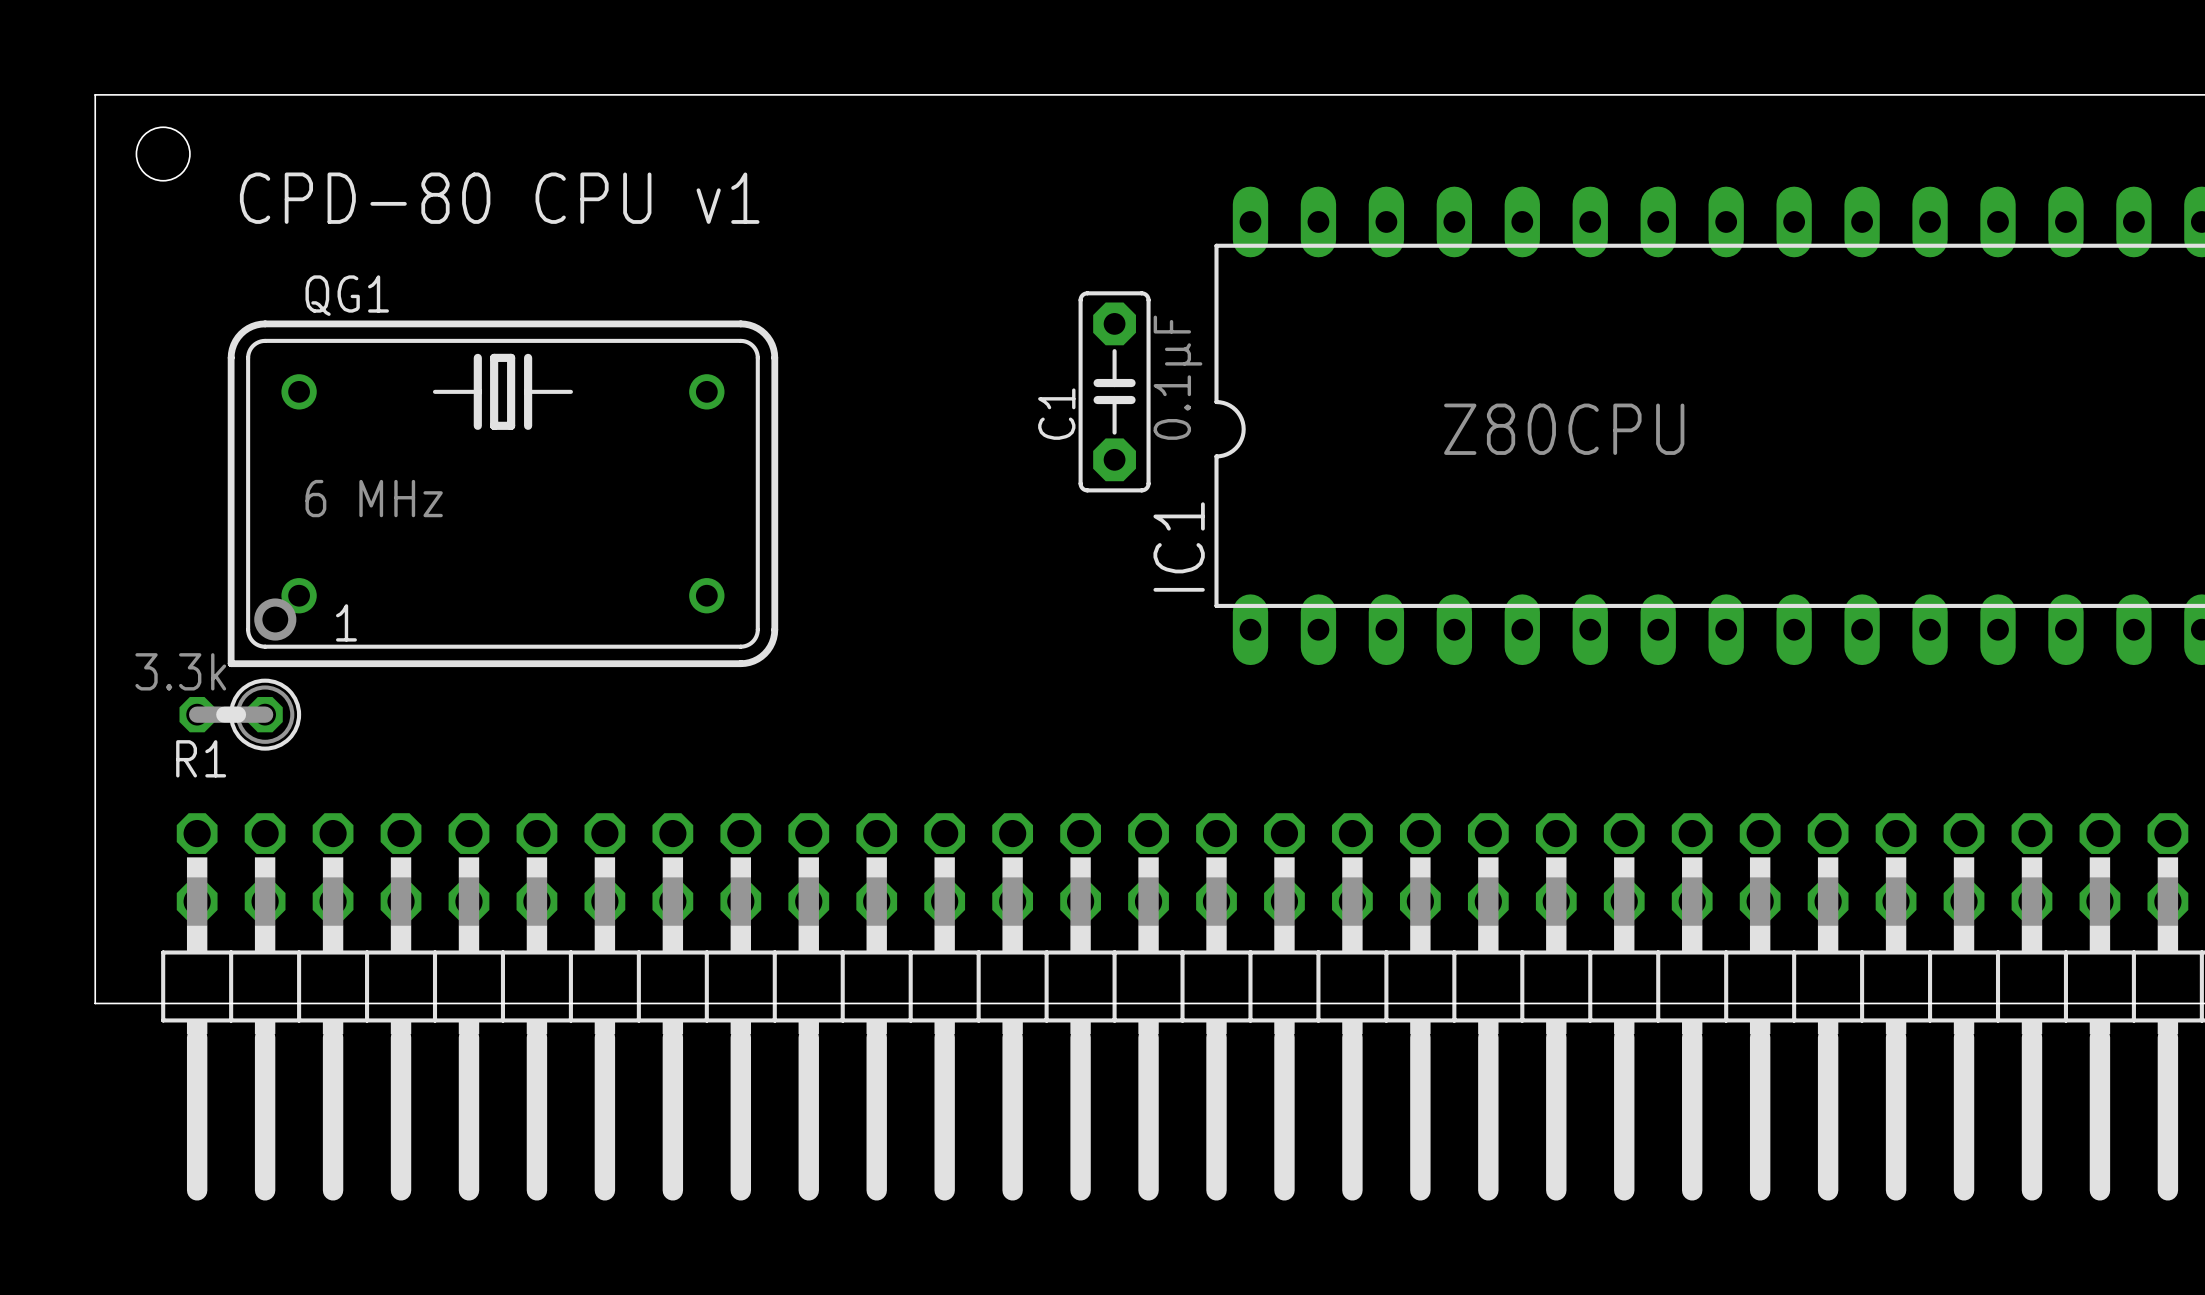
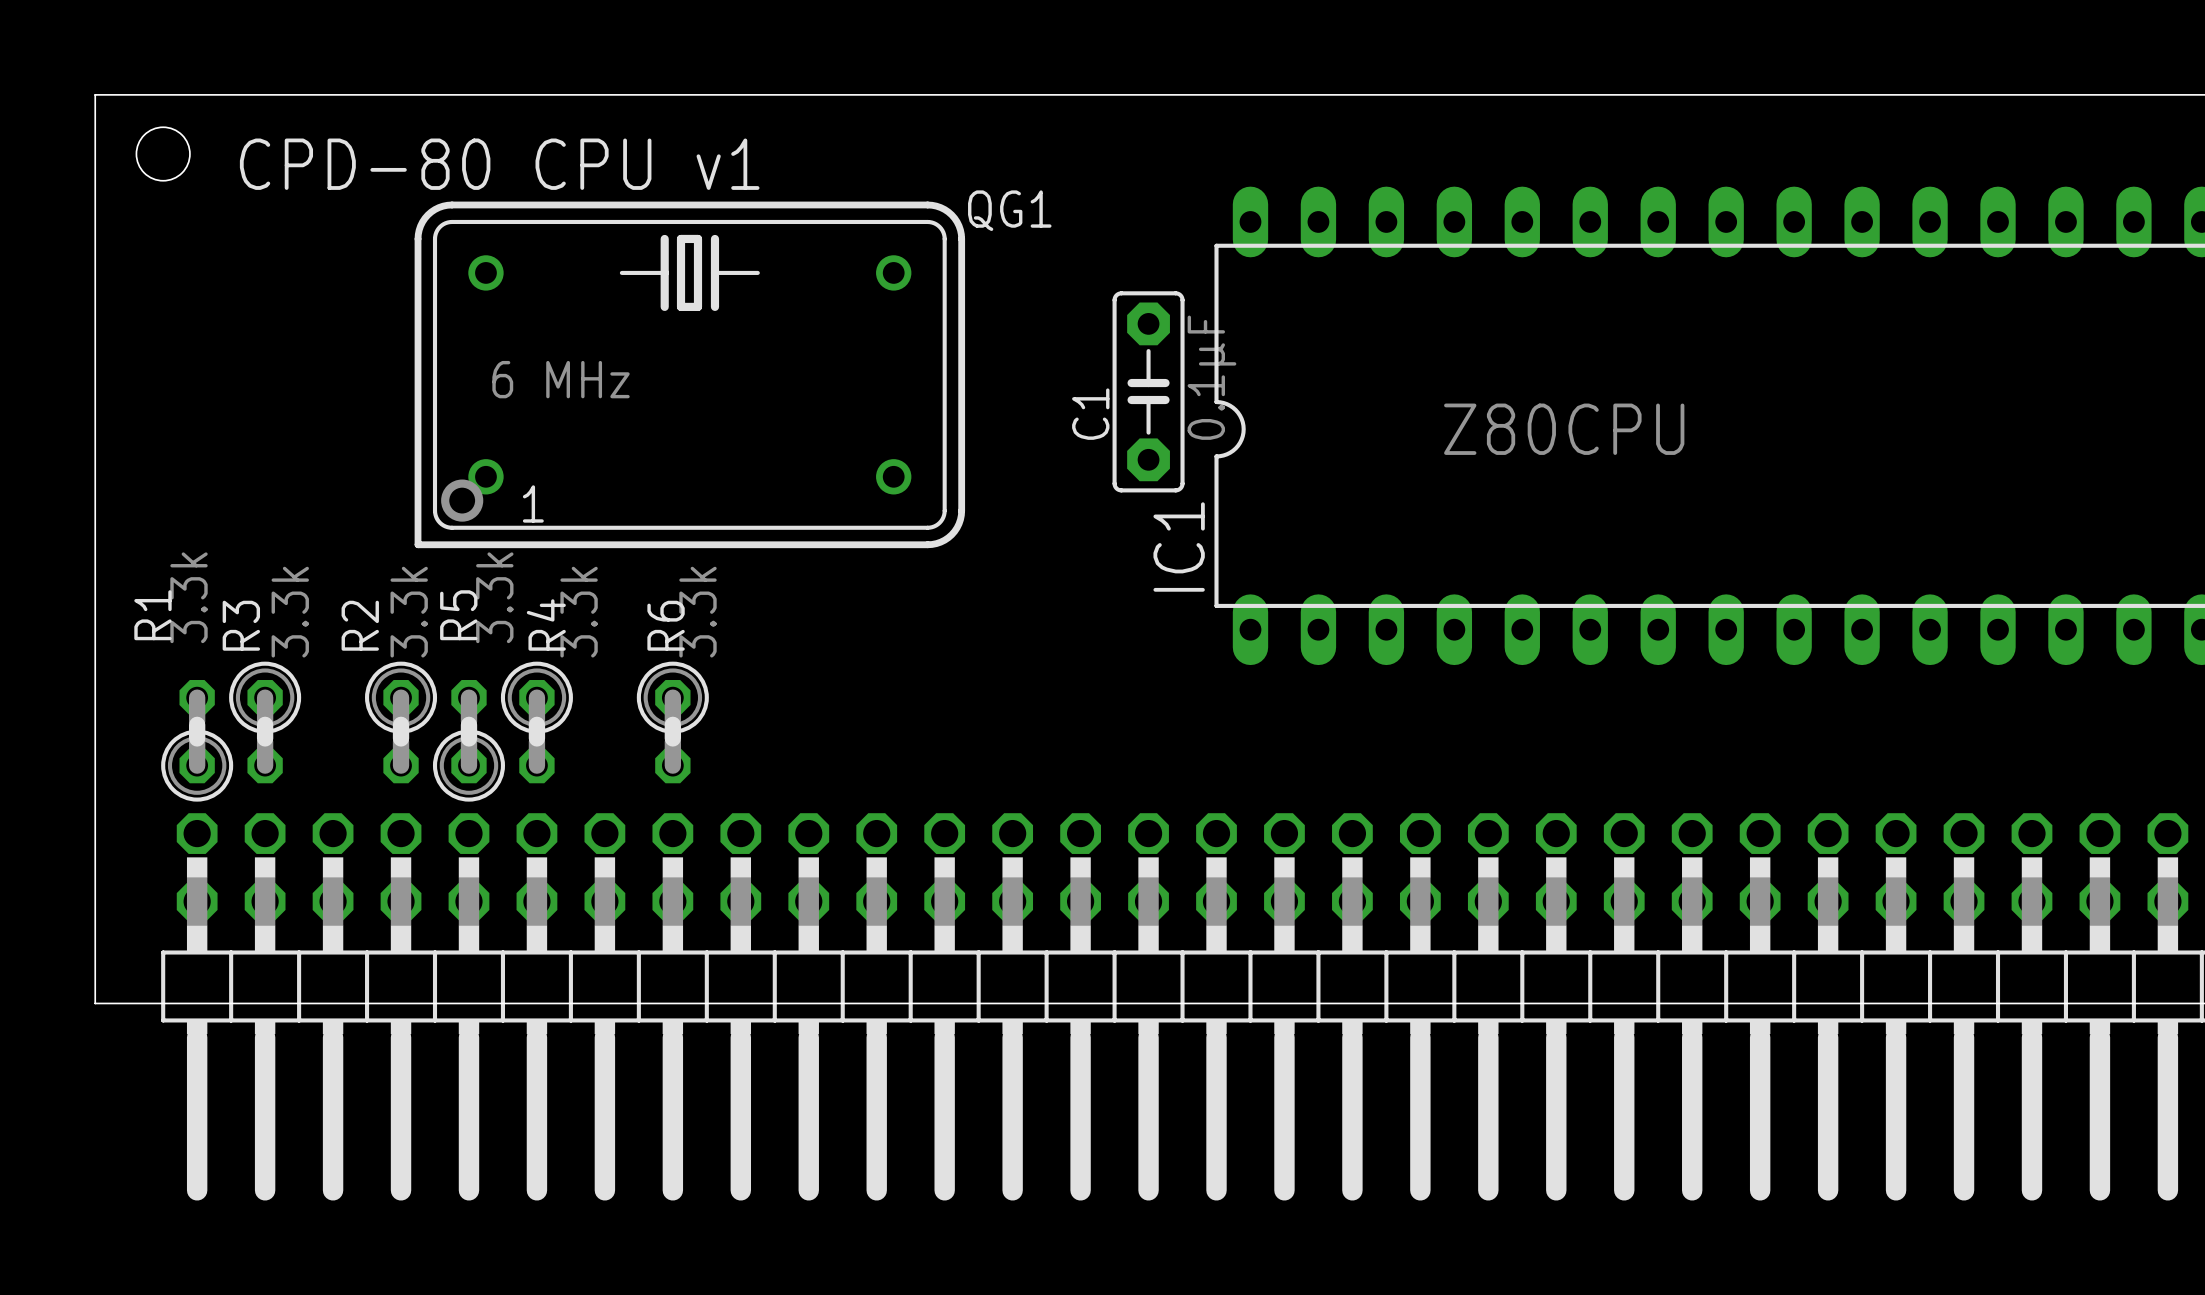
text position: CPD-80 CPU v1 (499, 198) -> CPD-80 CPU v1 (499, 164)
QG1 name position: QG1 (347, 295) -> QG1 (1009, 210)
C1 position: (1114, 391) -> (1148, 391)
QG1 position: (502, 493) -> (689, 374)
R1 value position: 3.3k (180, 671) -> 3.3k (189, 597)
R1 rotation: 0° (240, 714) -> 90° clockwise (197, 740)
R3: none -> 3.3k (265, 722)
R2: none -> 3.3k (401, 722)
R4: none -> 3.3k (536, 722)
R6: none -> 3.3k (672, 722)
R5: none -> 3.3k (468, 740)
R1 name position: R1 (201, 758) -> R1 (152, 615)

